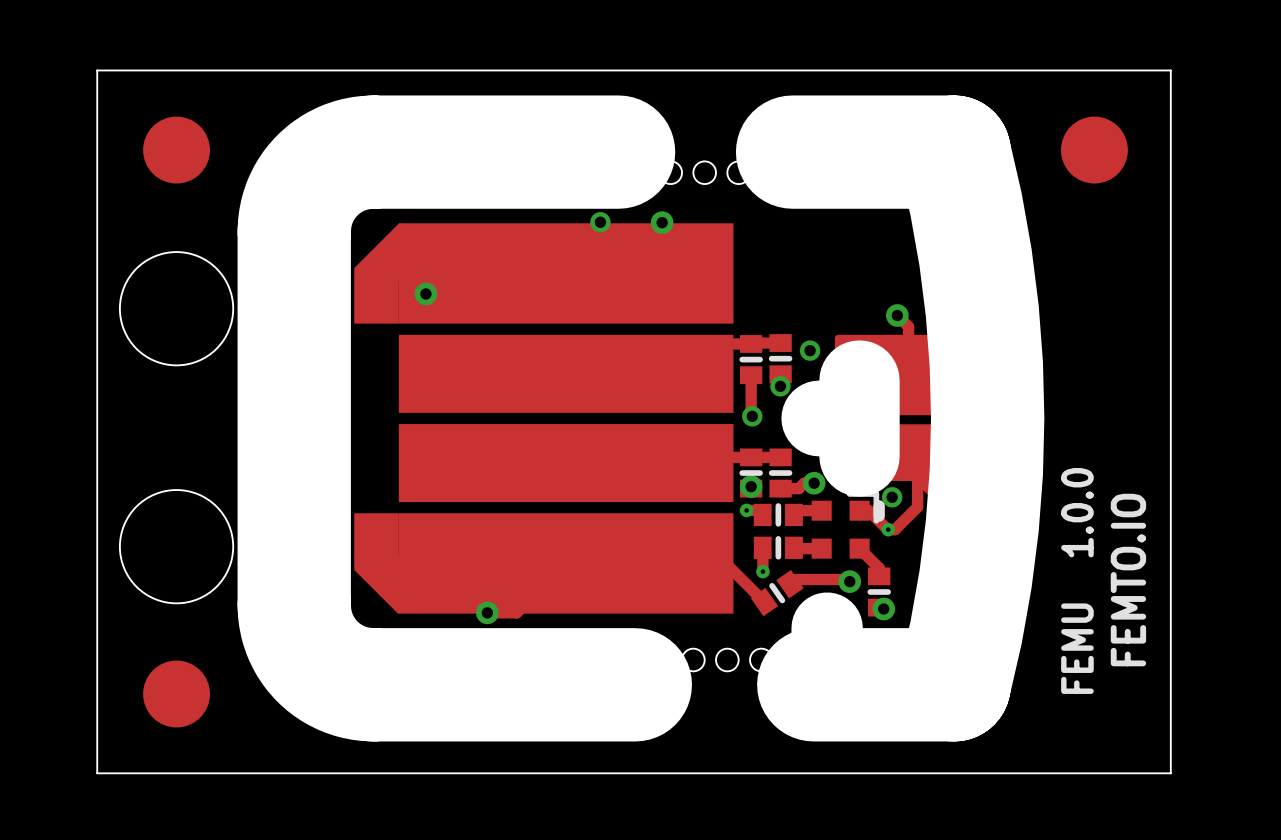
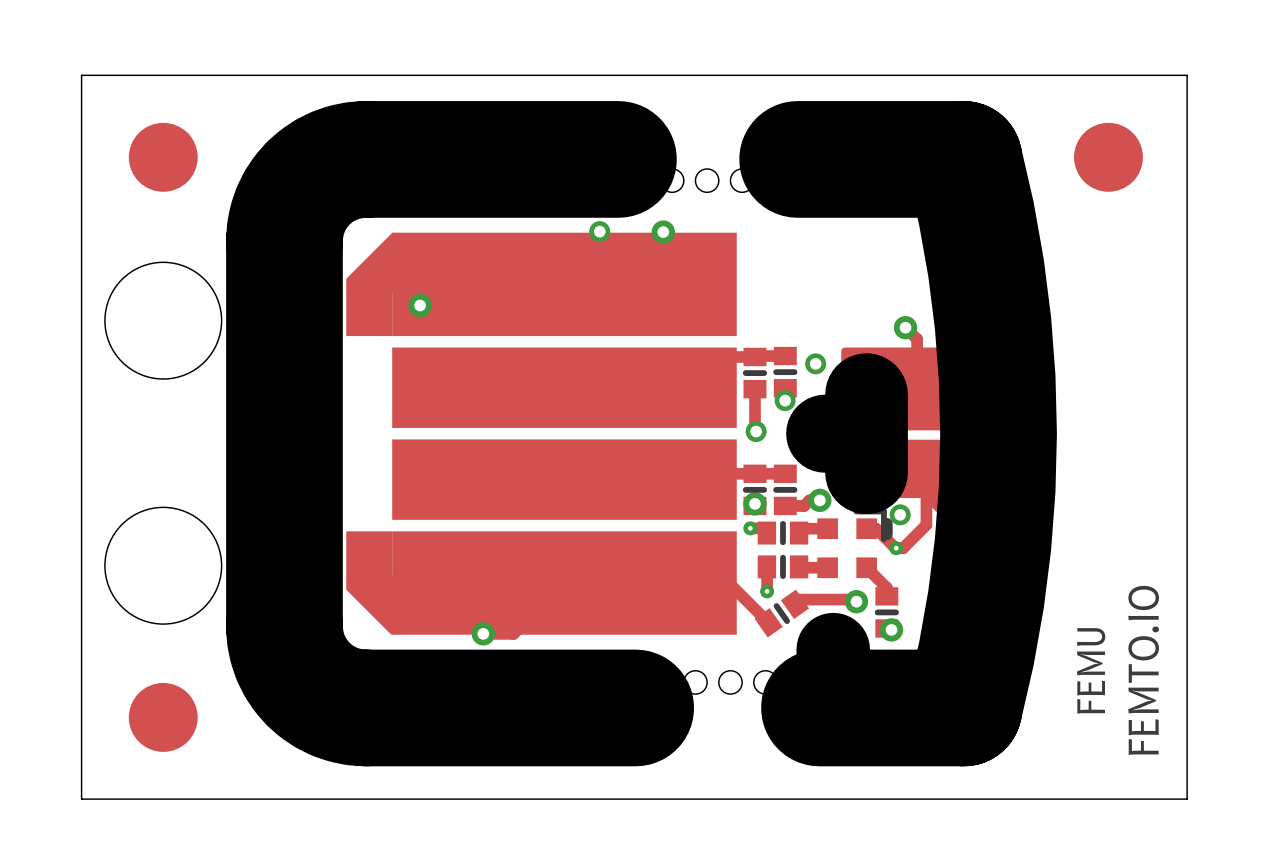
text: 1.0.0 (1077, 512) -> none
text position: FEMTO.IO (1128, 580) -> FEMTO.IO (1143, 670)

